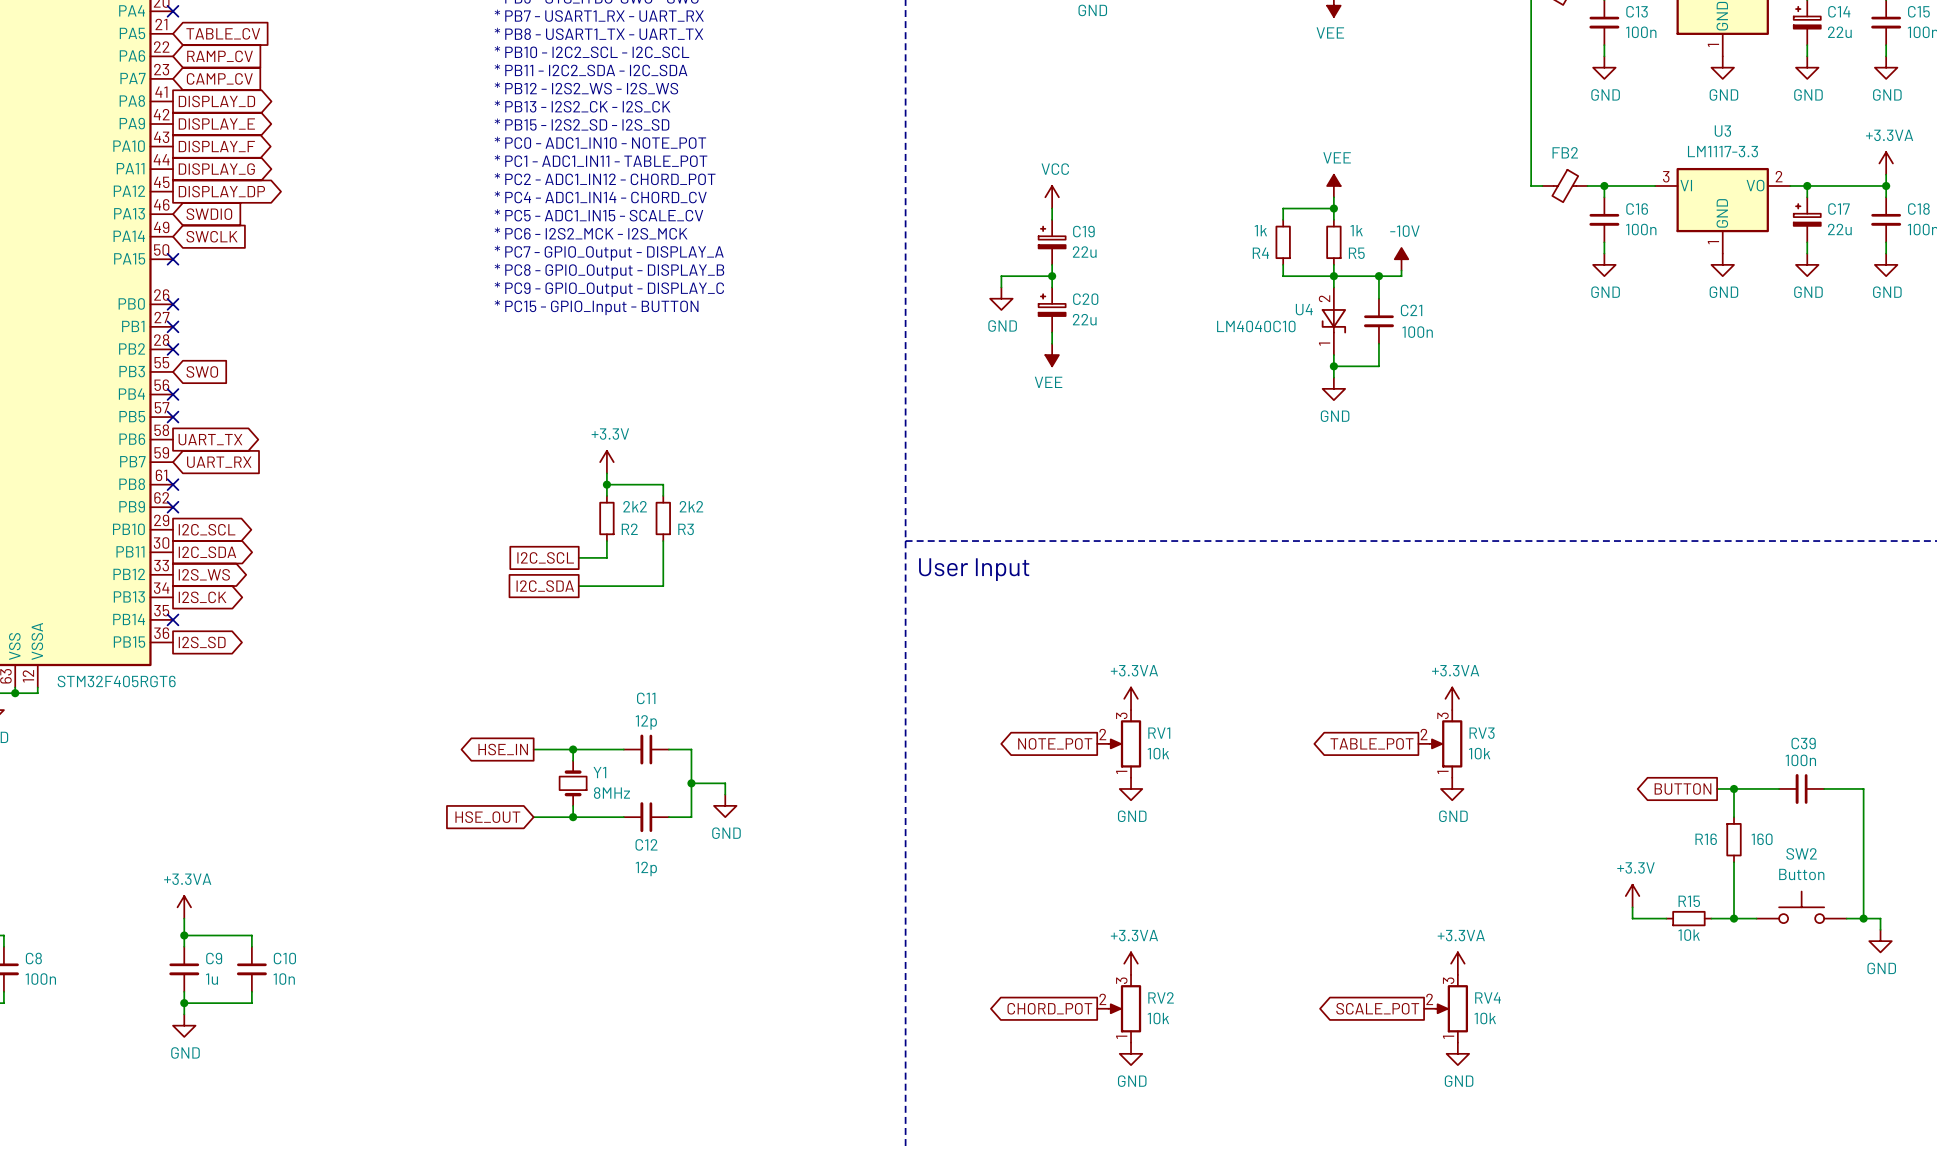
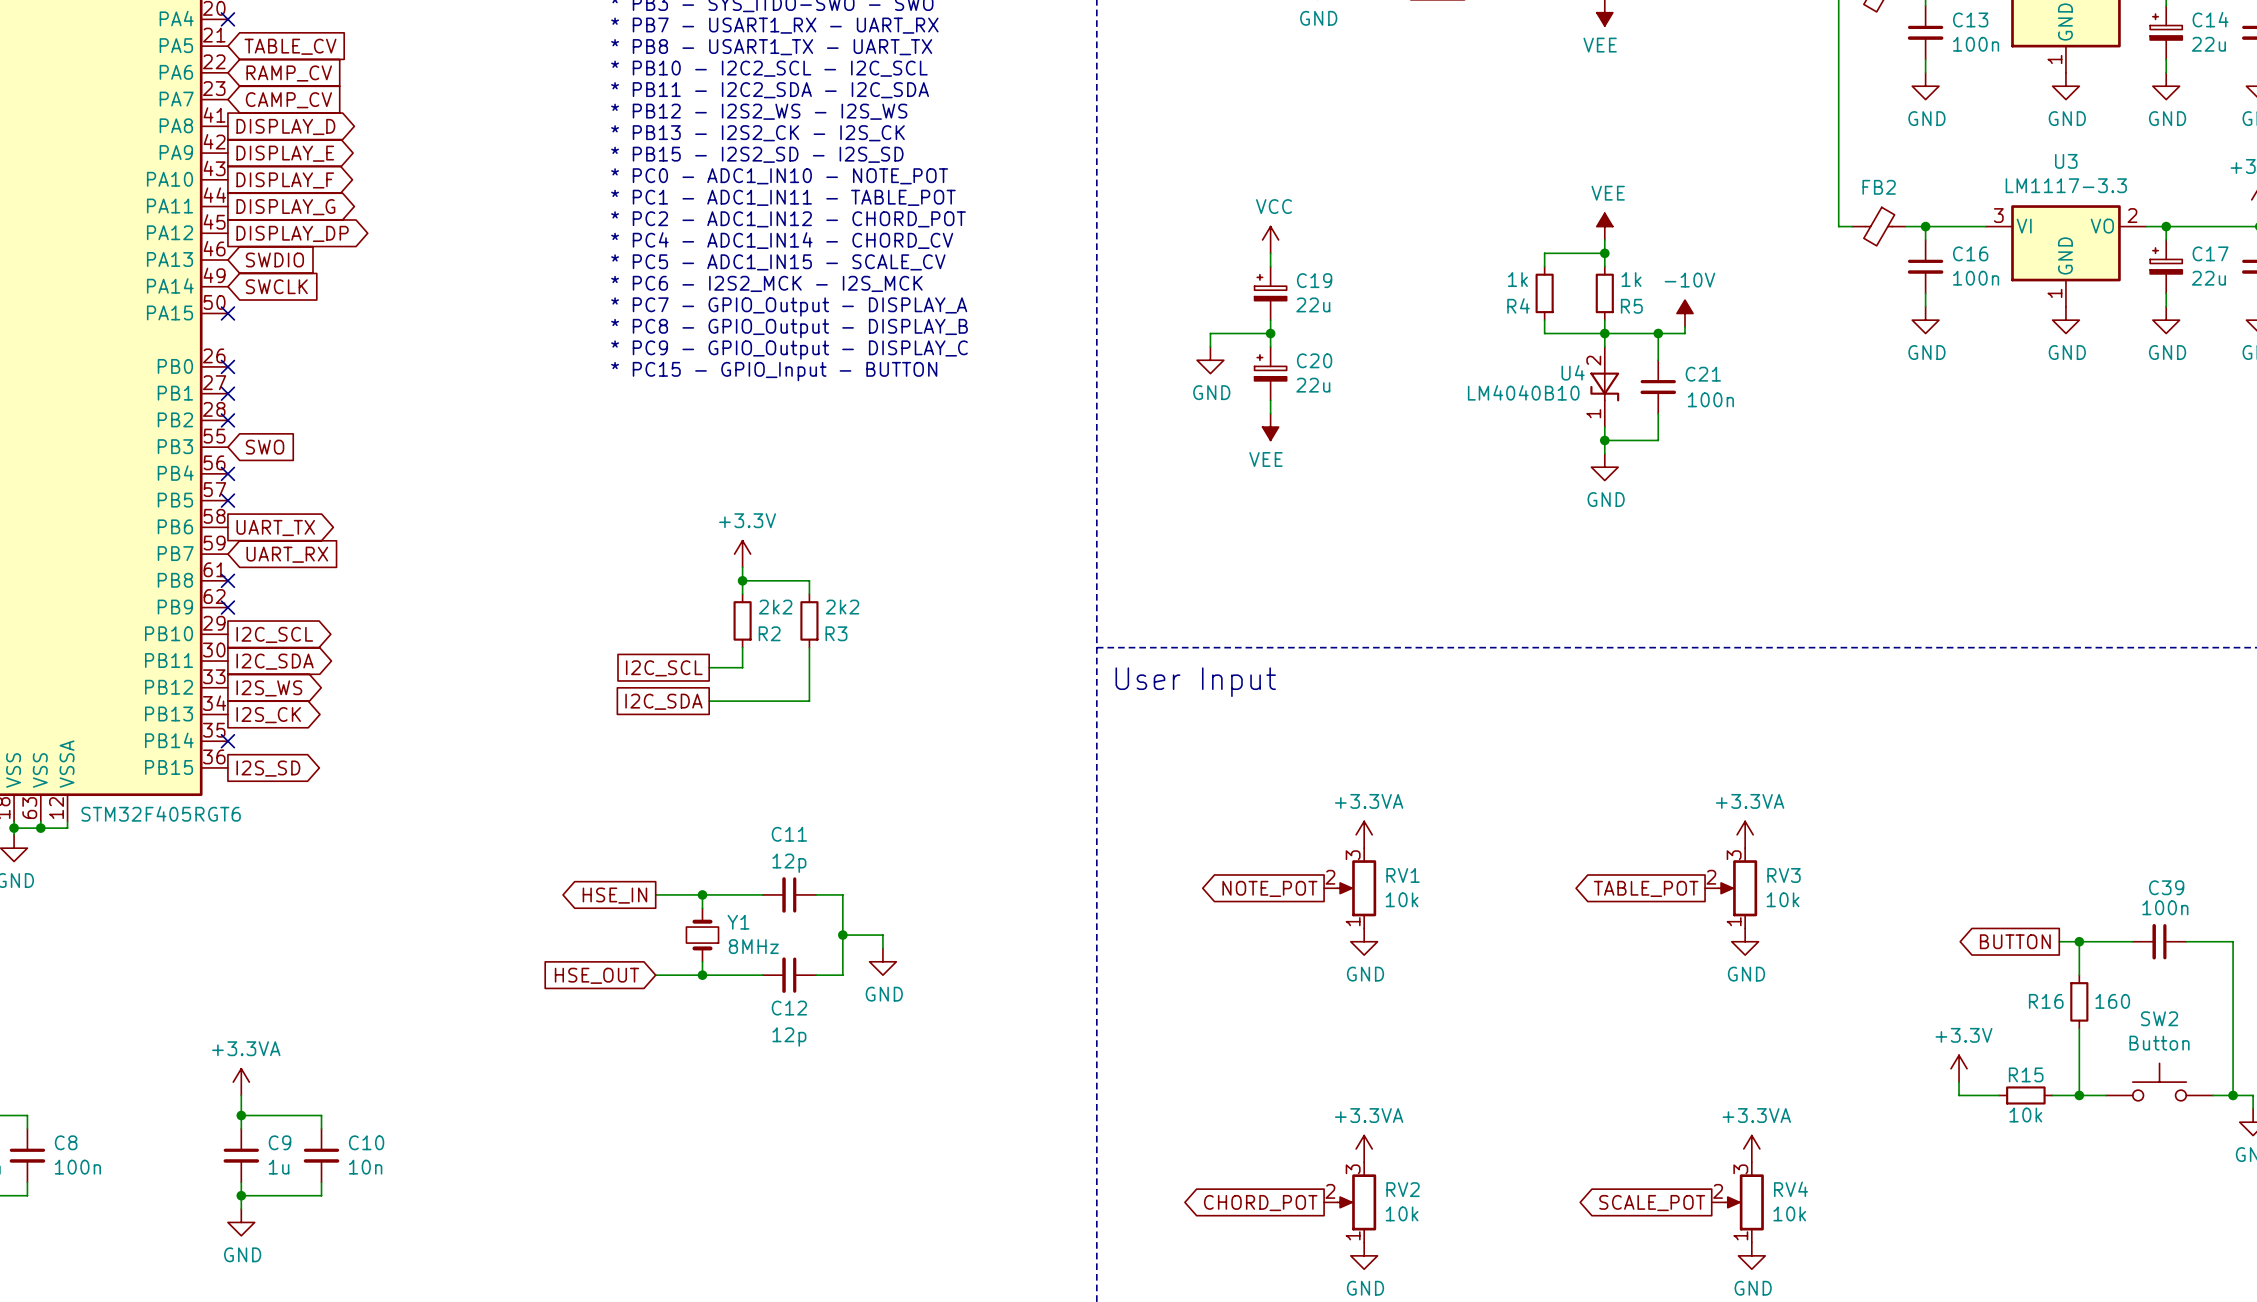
U4 value: LM4040C10 (1256, 326) -> LM4040B10 (1523, 392)

